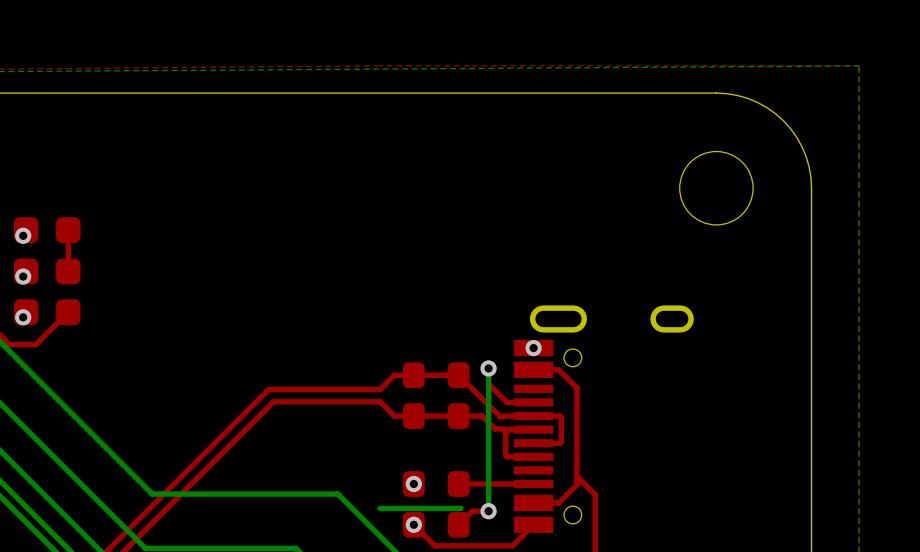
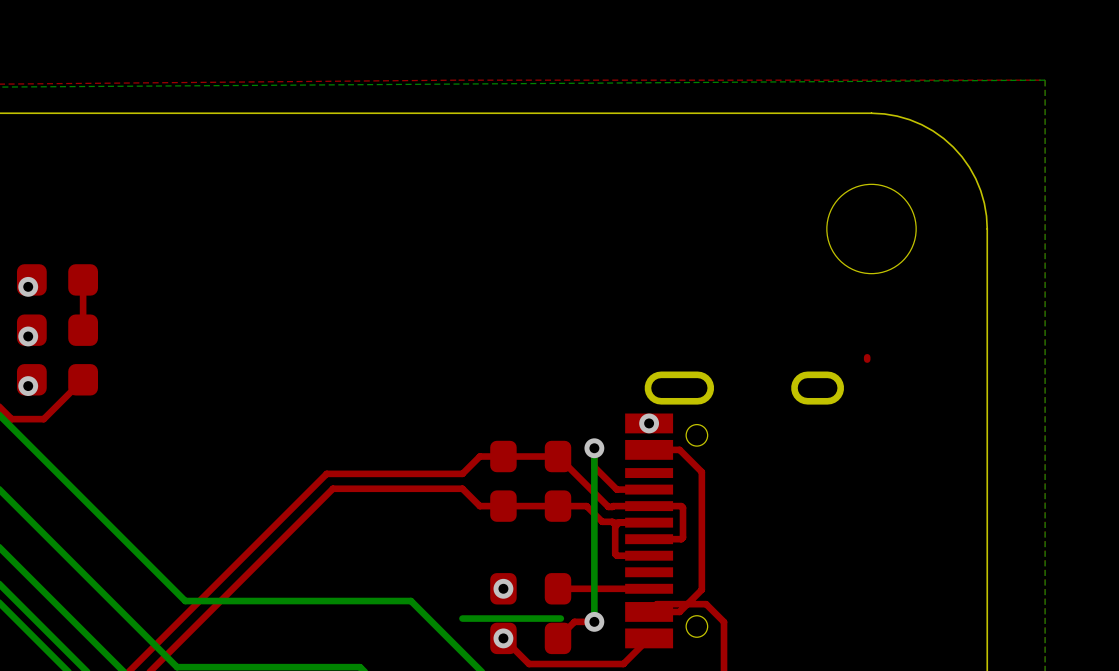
top track: none -> (867, 357) (867, 359)
top track: (576, 476) (595, 494) (595, 511) -> (649, 611) (656, 604) (706, 604) (724, 622)

